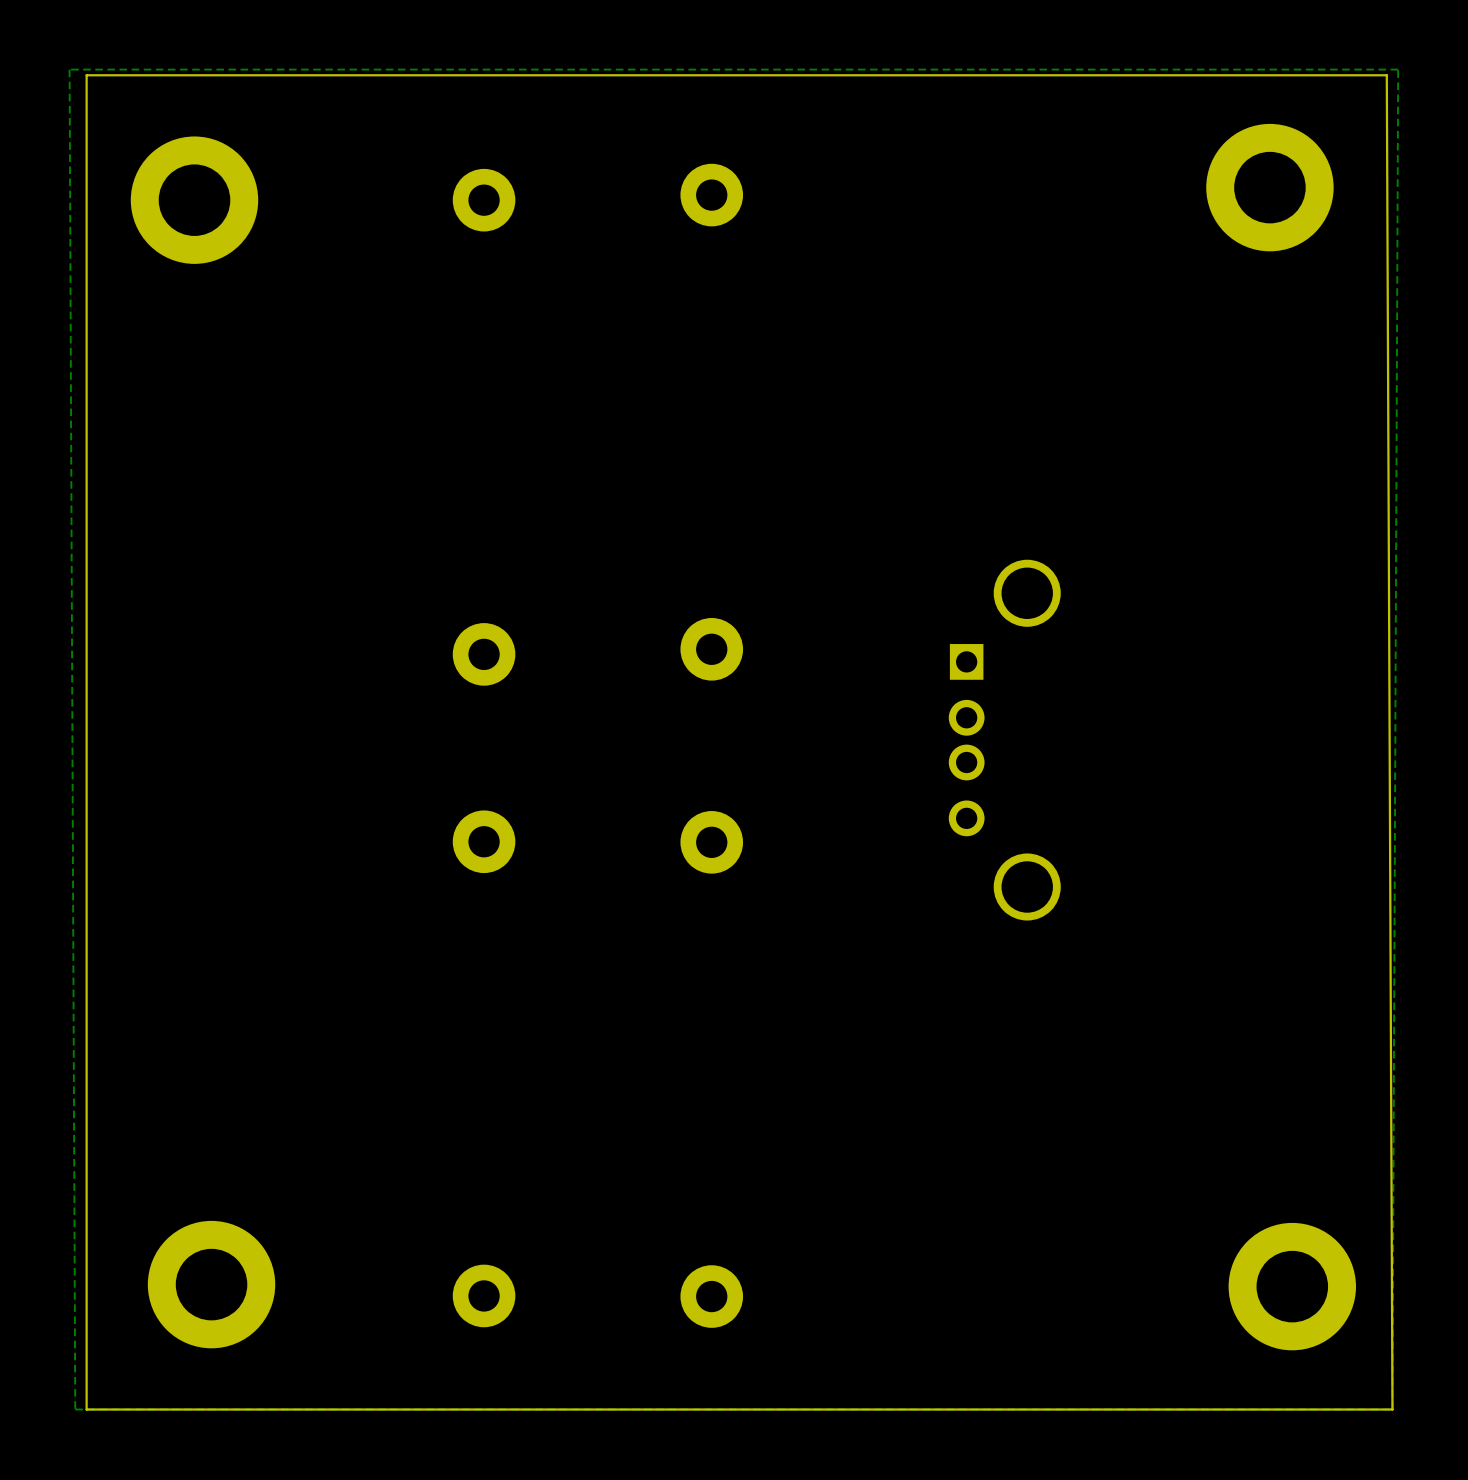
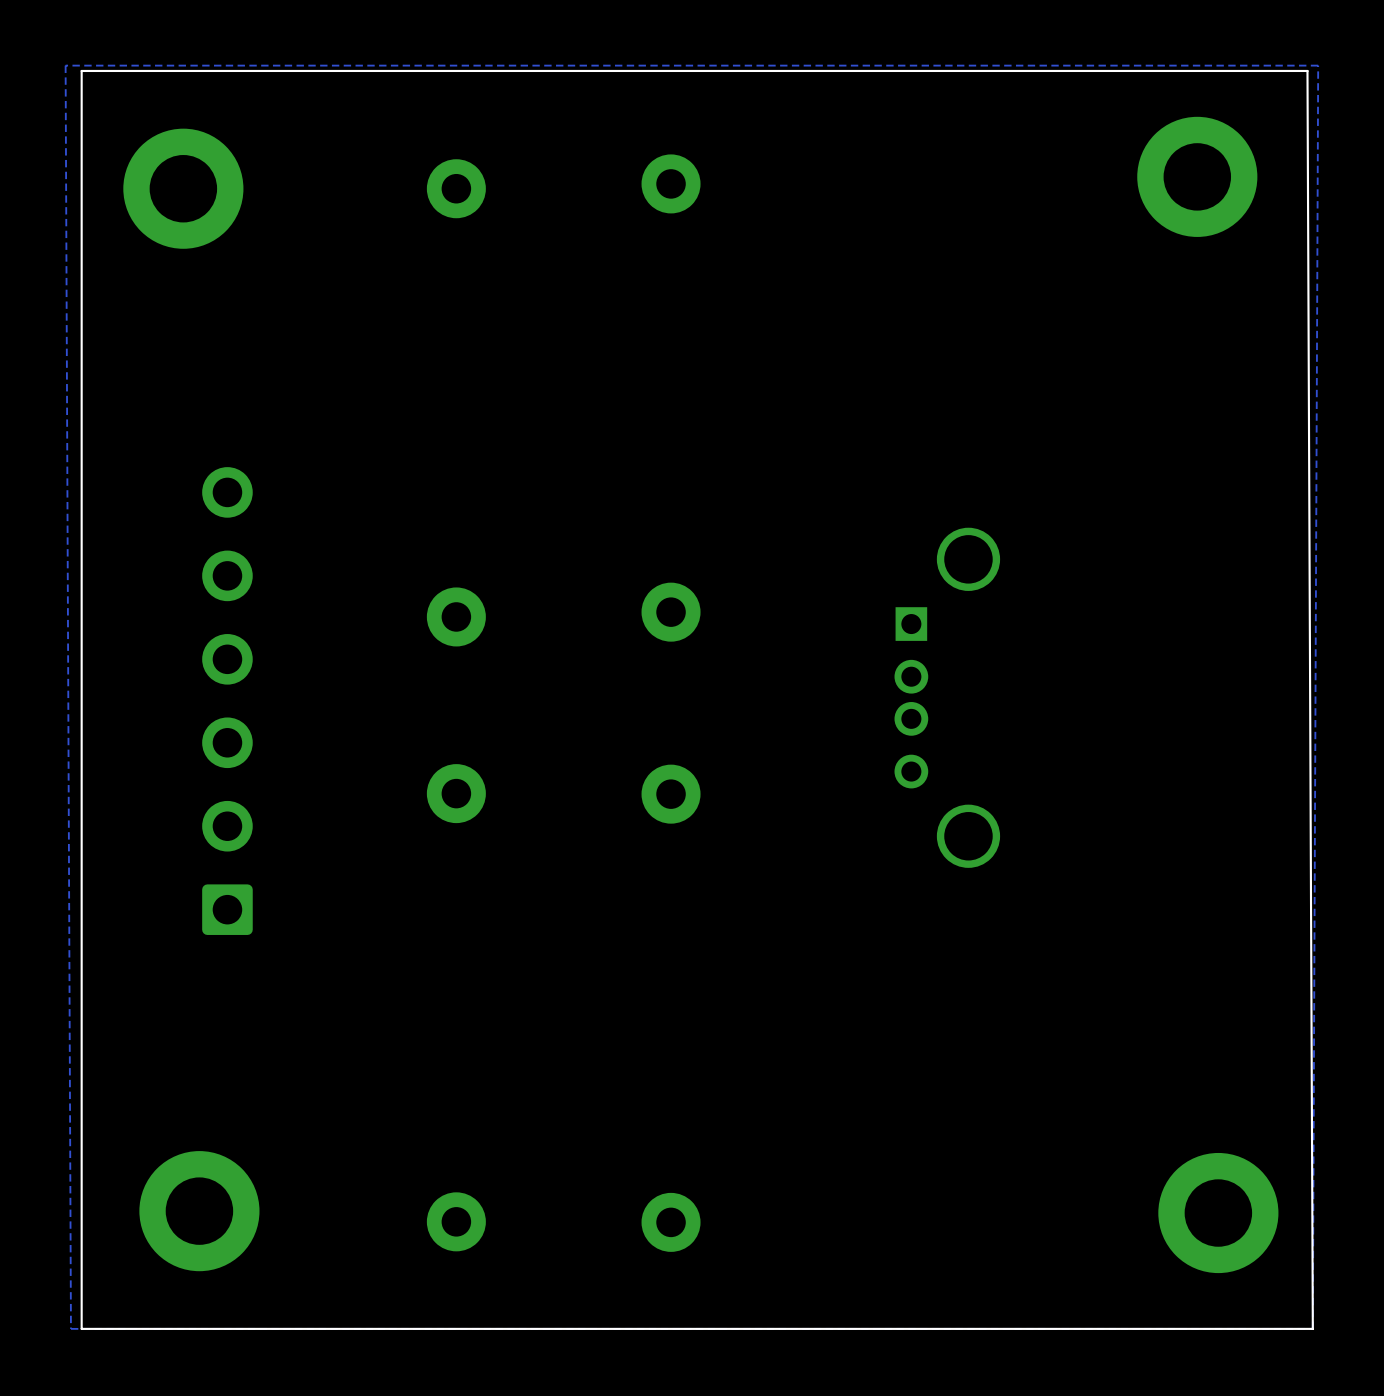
part: none -> (227, 701)

